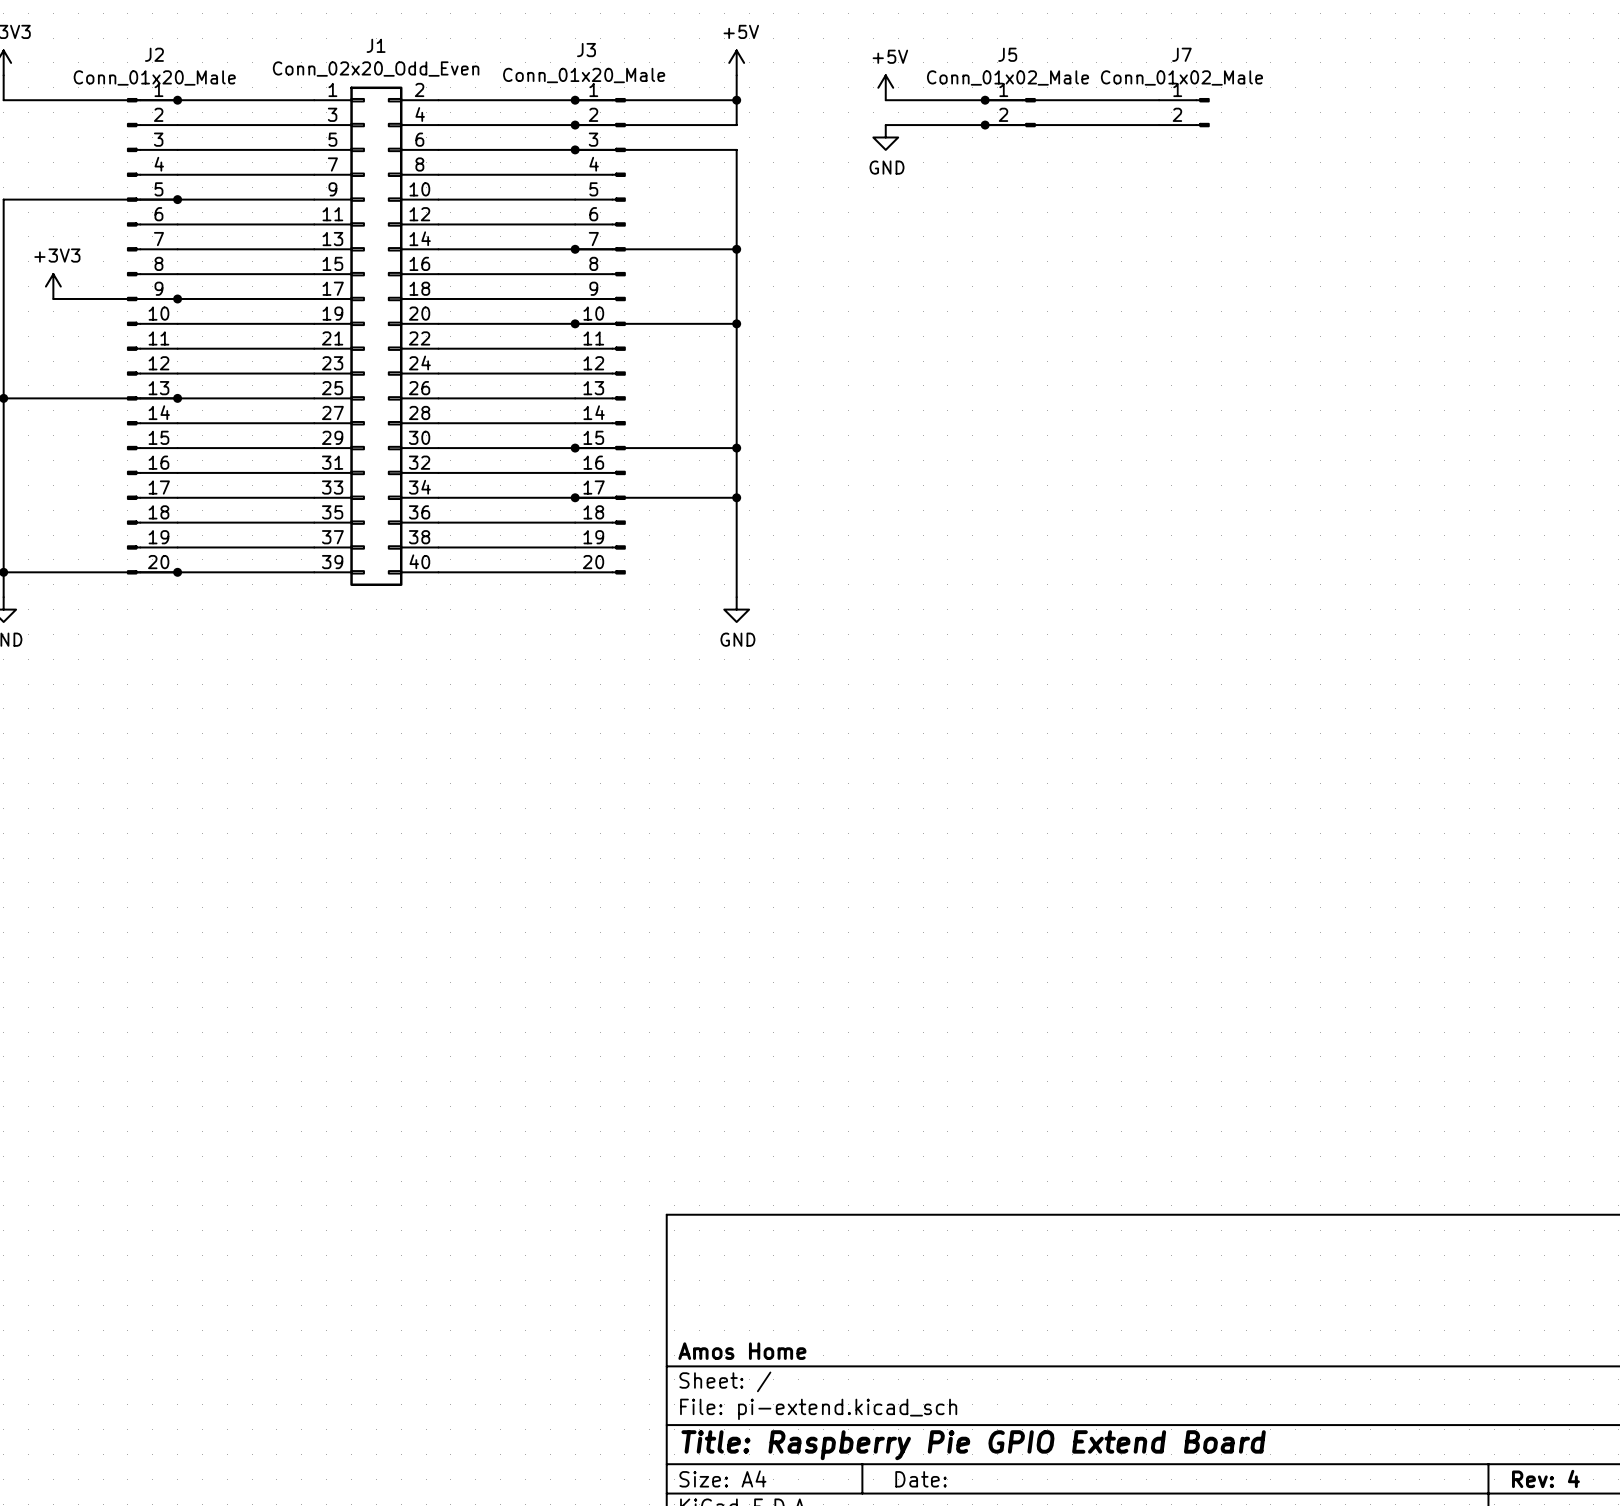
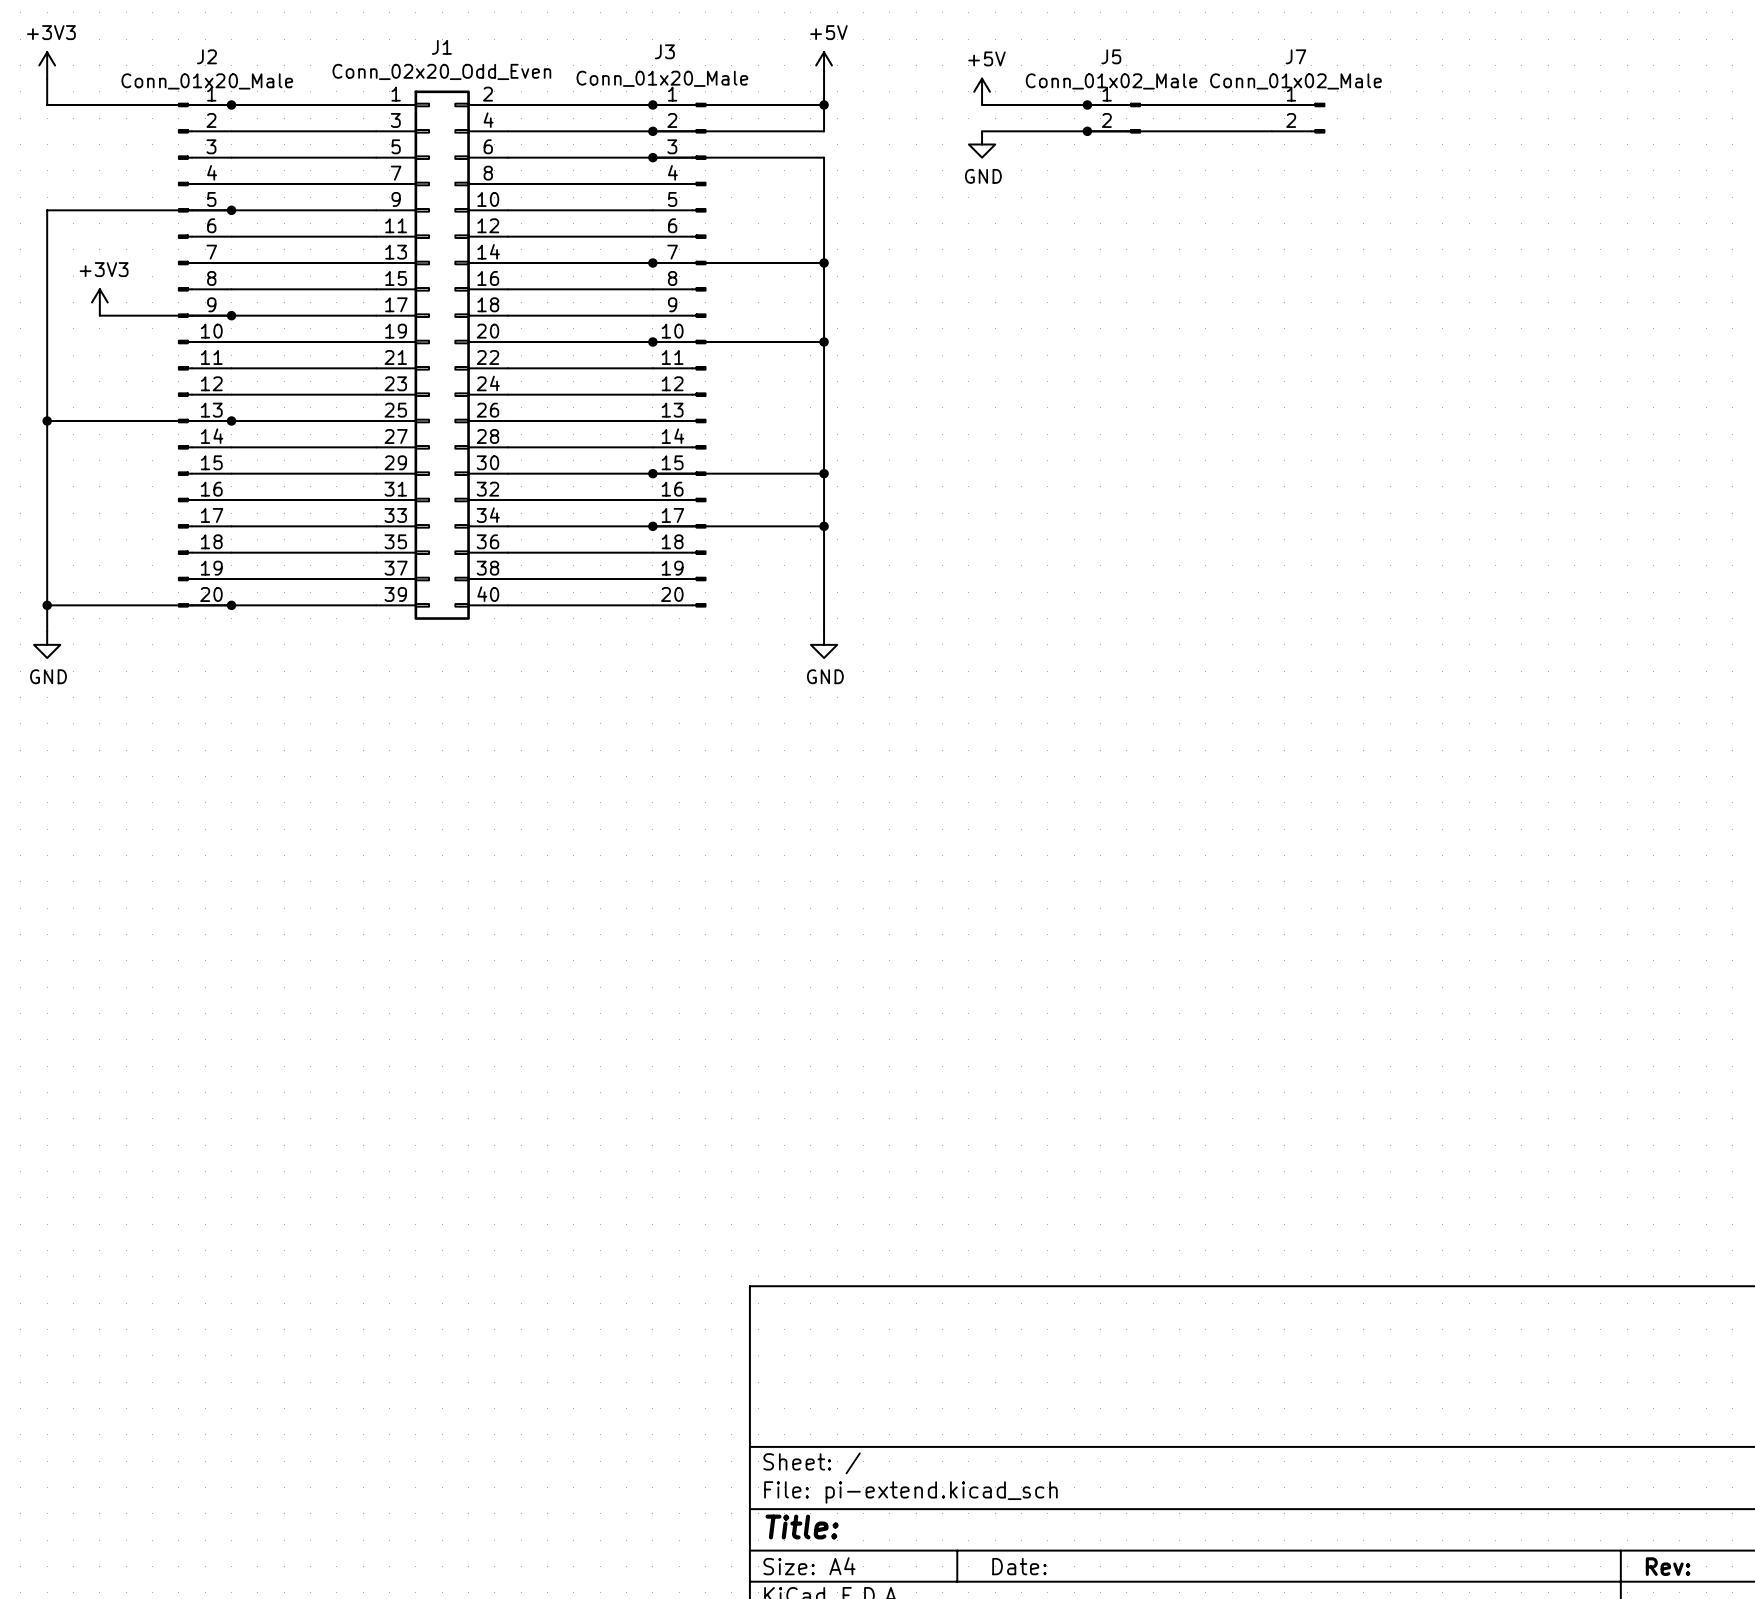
title block: Amos Home (742, 1351) -> none
title block: Title: Raspberry Pie GPIO Extend Board (973, 1445) -> Title: (802, 1527)
title block: Rev: 4 (1545, 1478) -> Rev: (1668, 1566)

